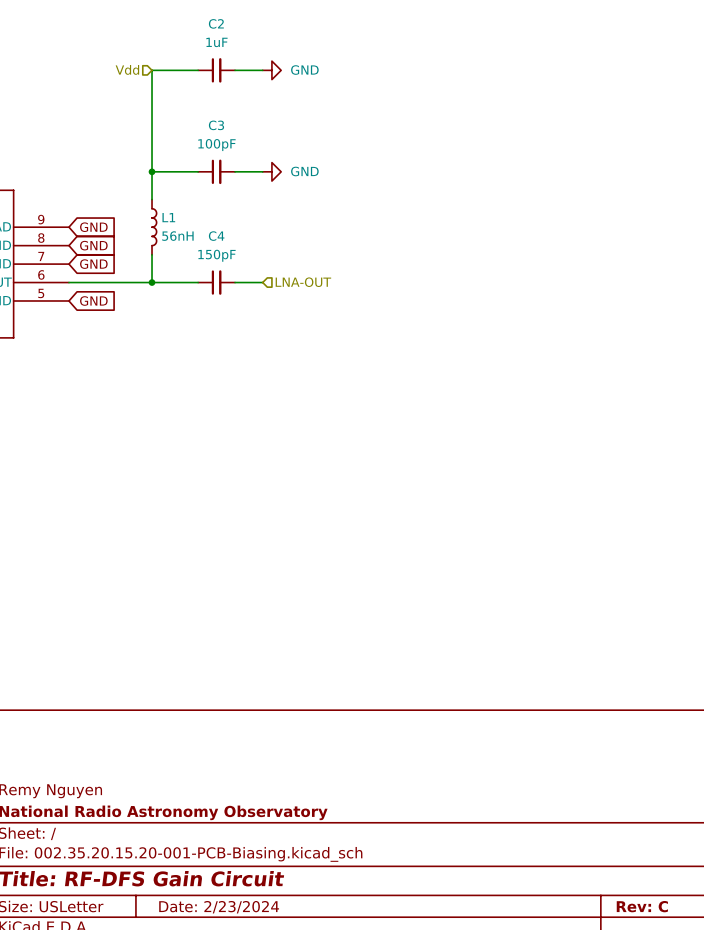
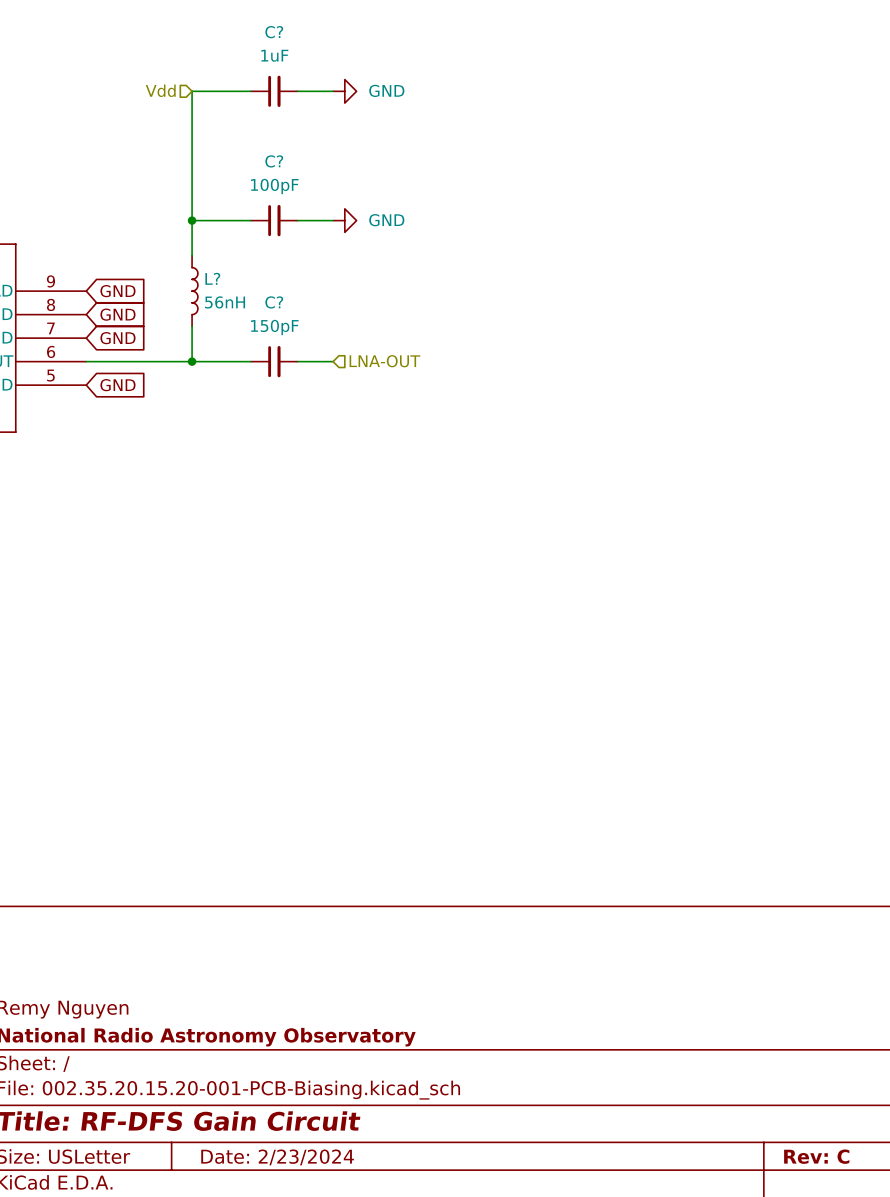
C2 name: C2 (216, 23) -> C? (274, 32)
C3 name: C3 (216, 125) -> C? (274, 161)
L1 name: L1 (168, 217) -> L? (212, 278)
C4 name: C4 (216, 236) -> C? (274, 302)

